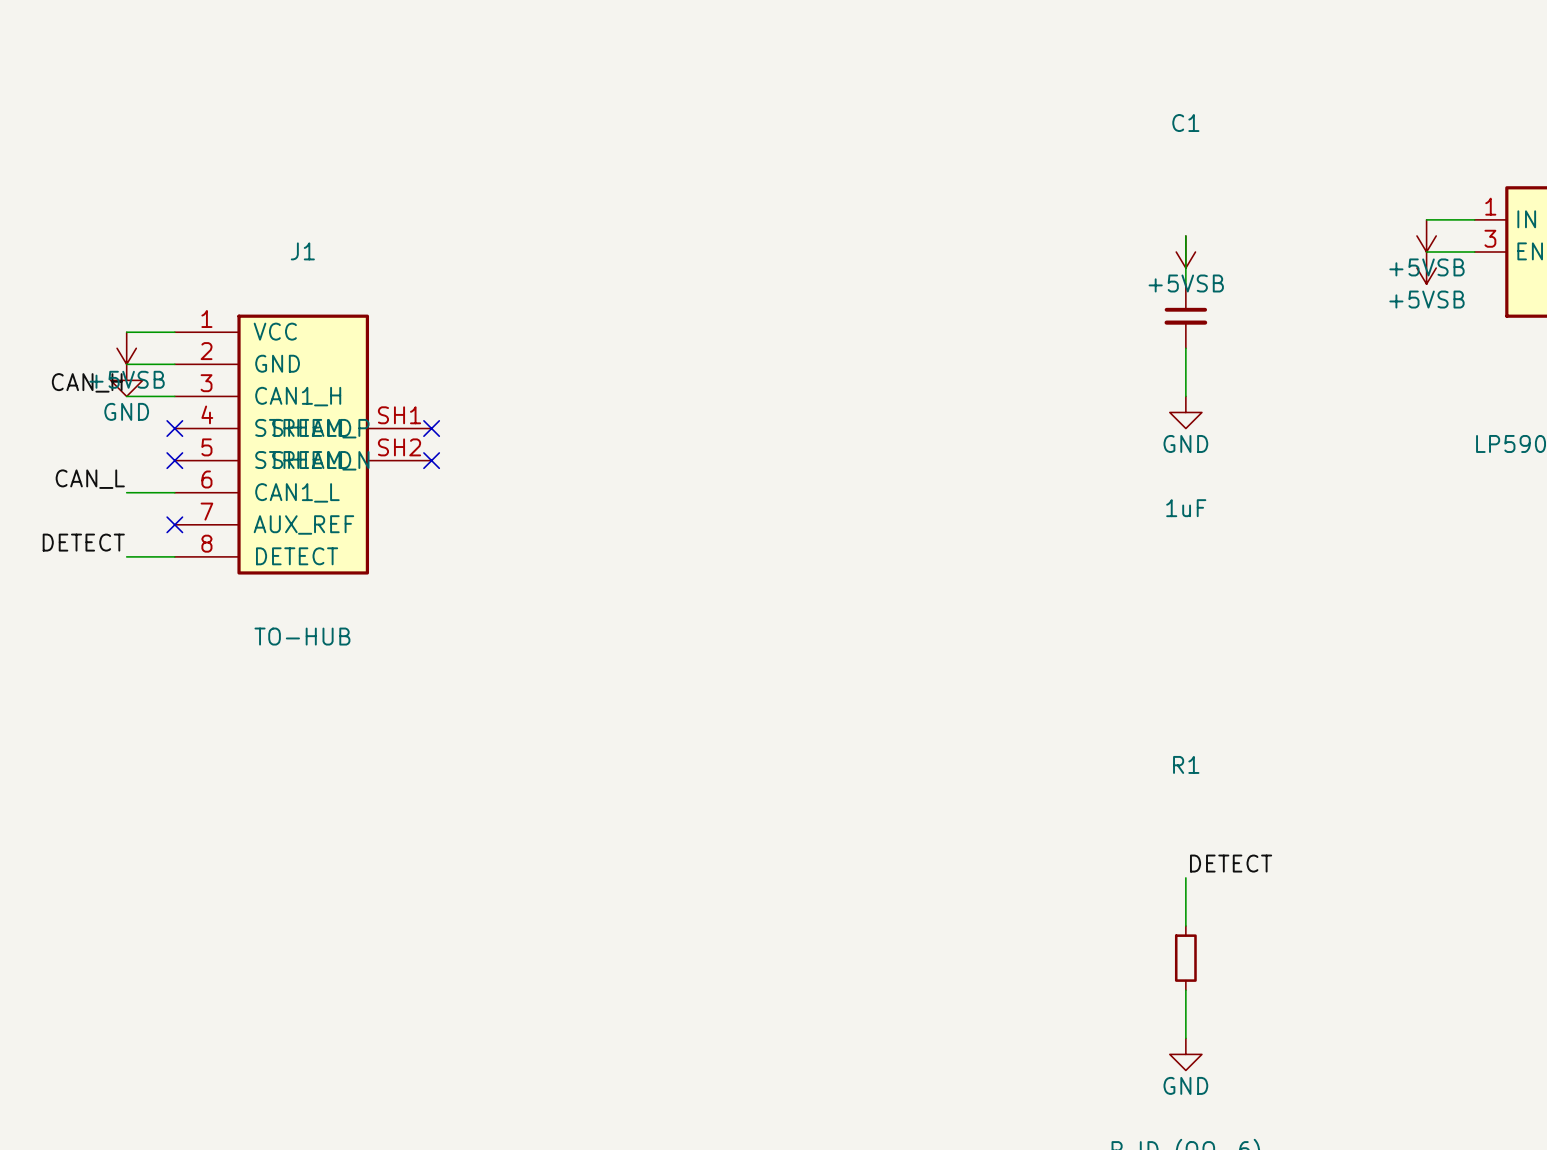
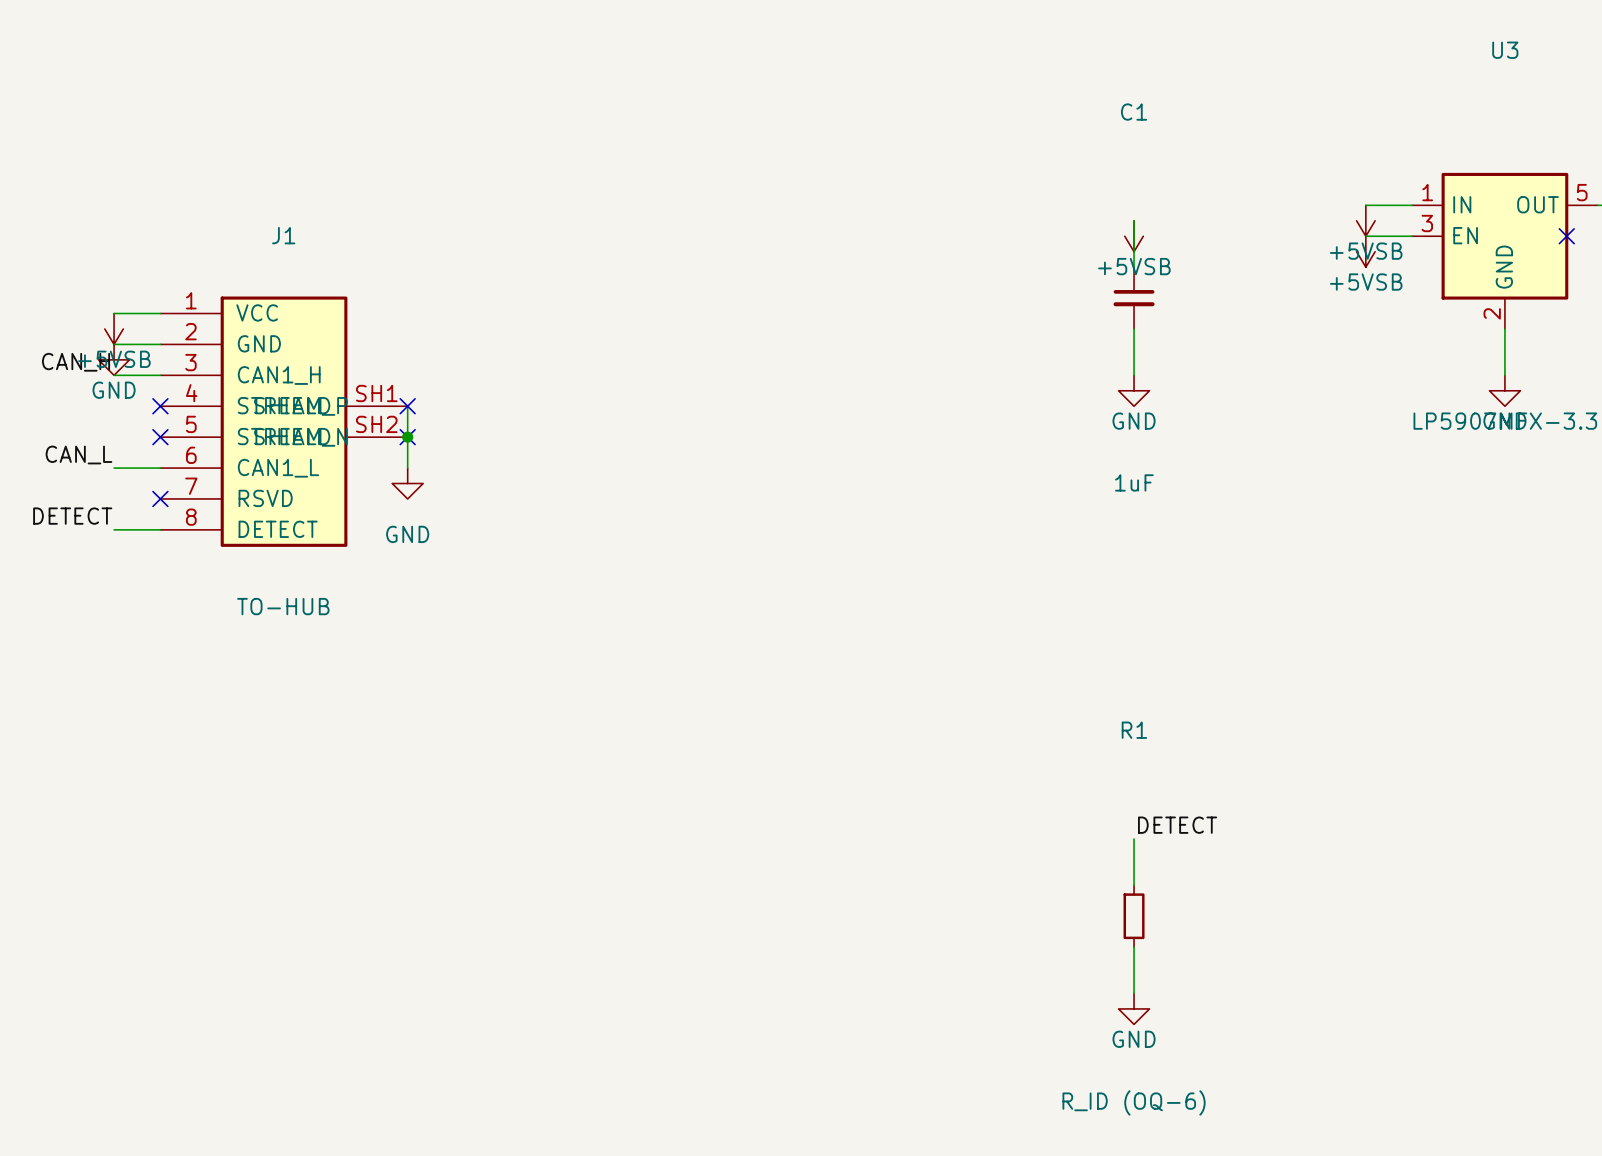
wire: none -> (407, 406) (407, 468)
junction: none -> (407, 437)
power symbol: none -> GND (407, 483)
J1 pin name: AUX_REF (303, 524) -> RSVD (265, 498)

